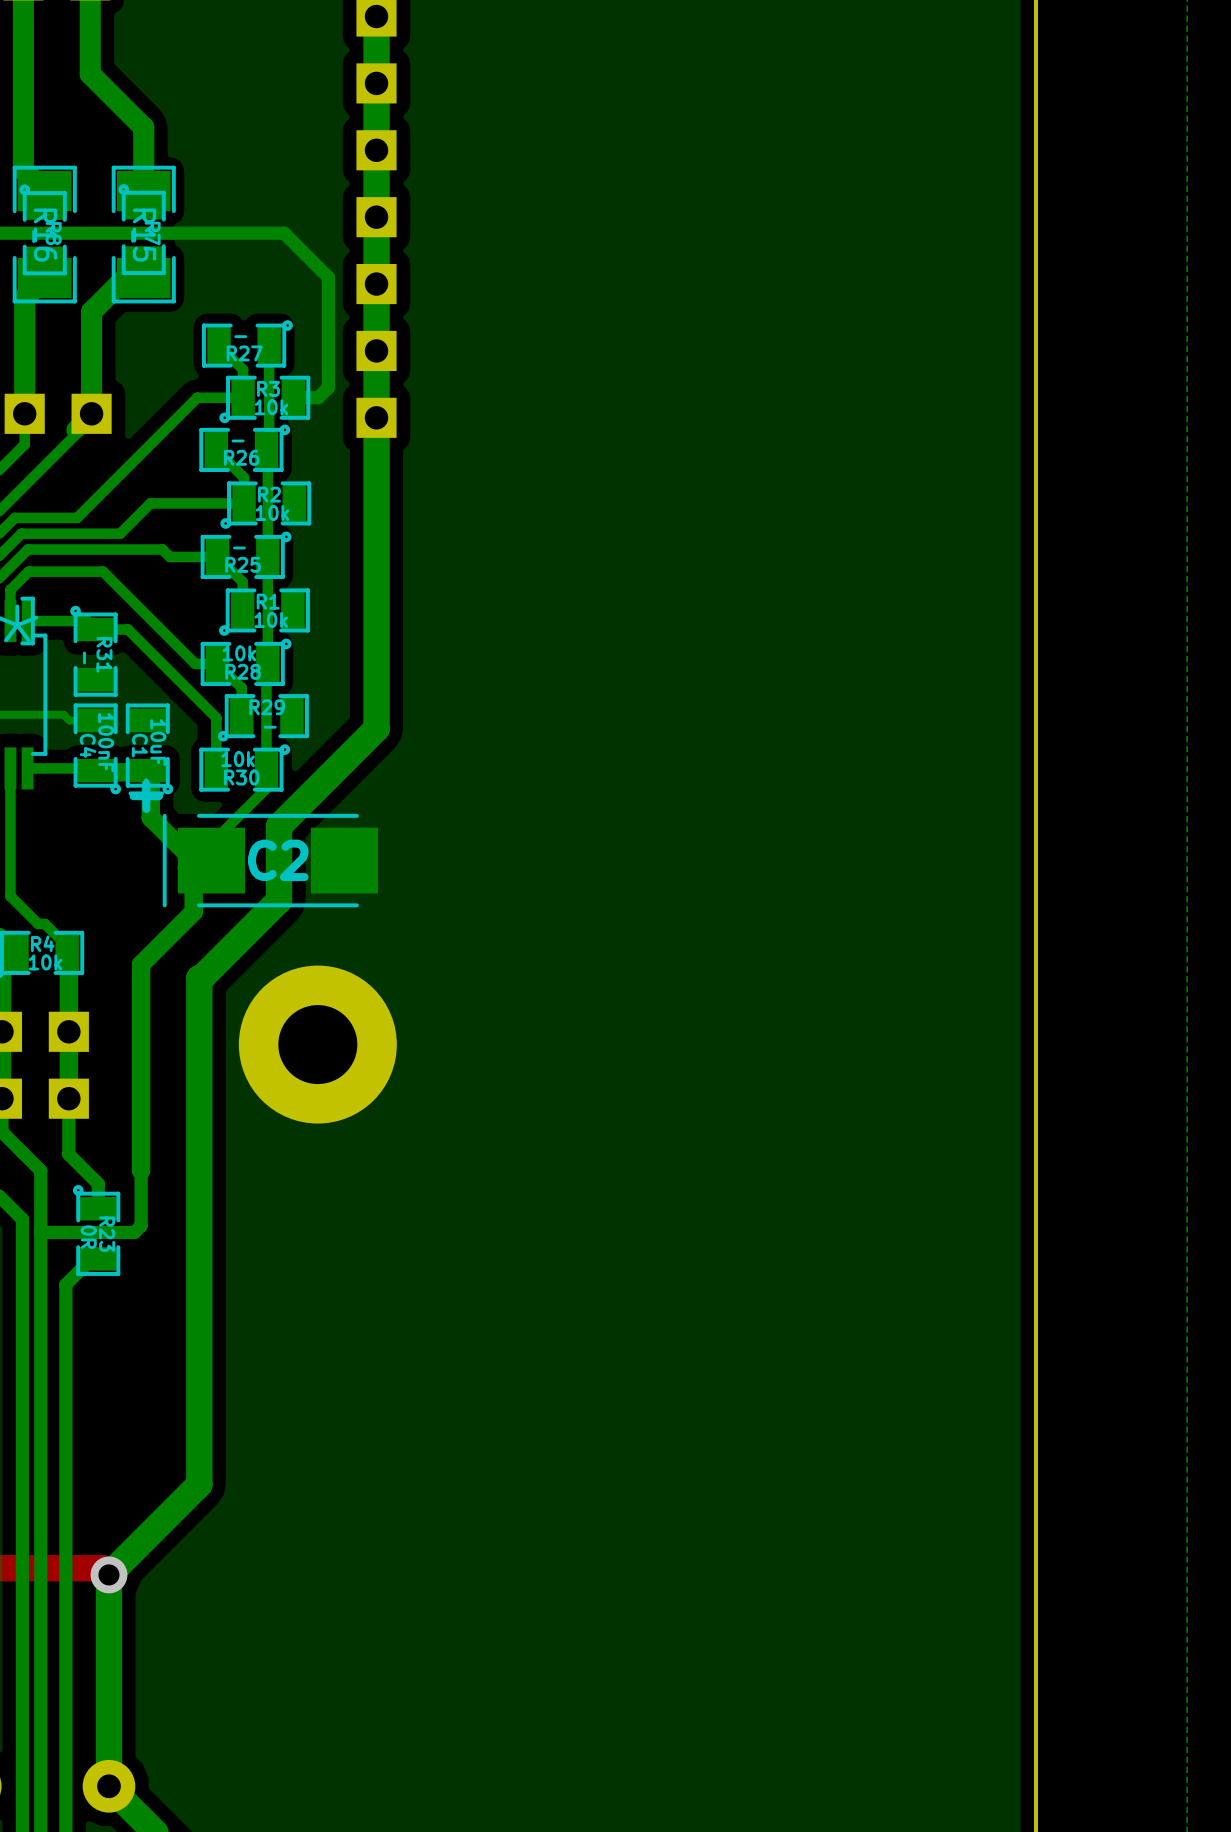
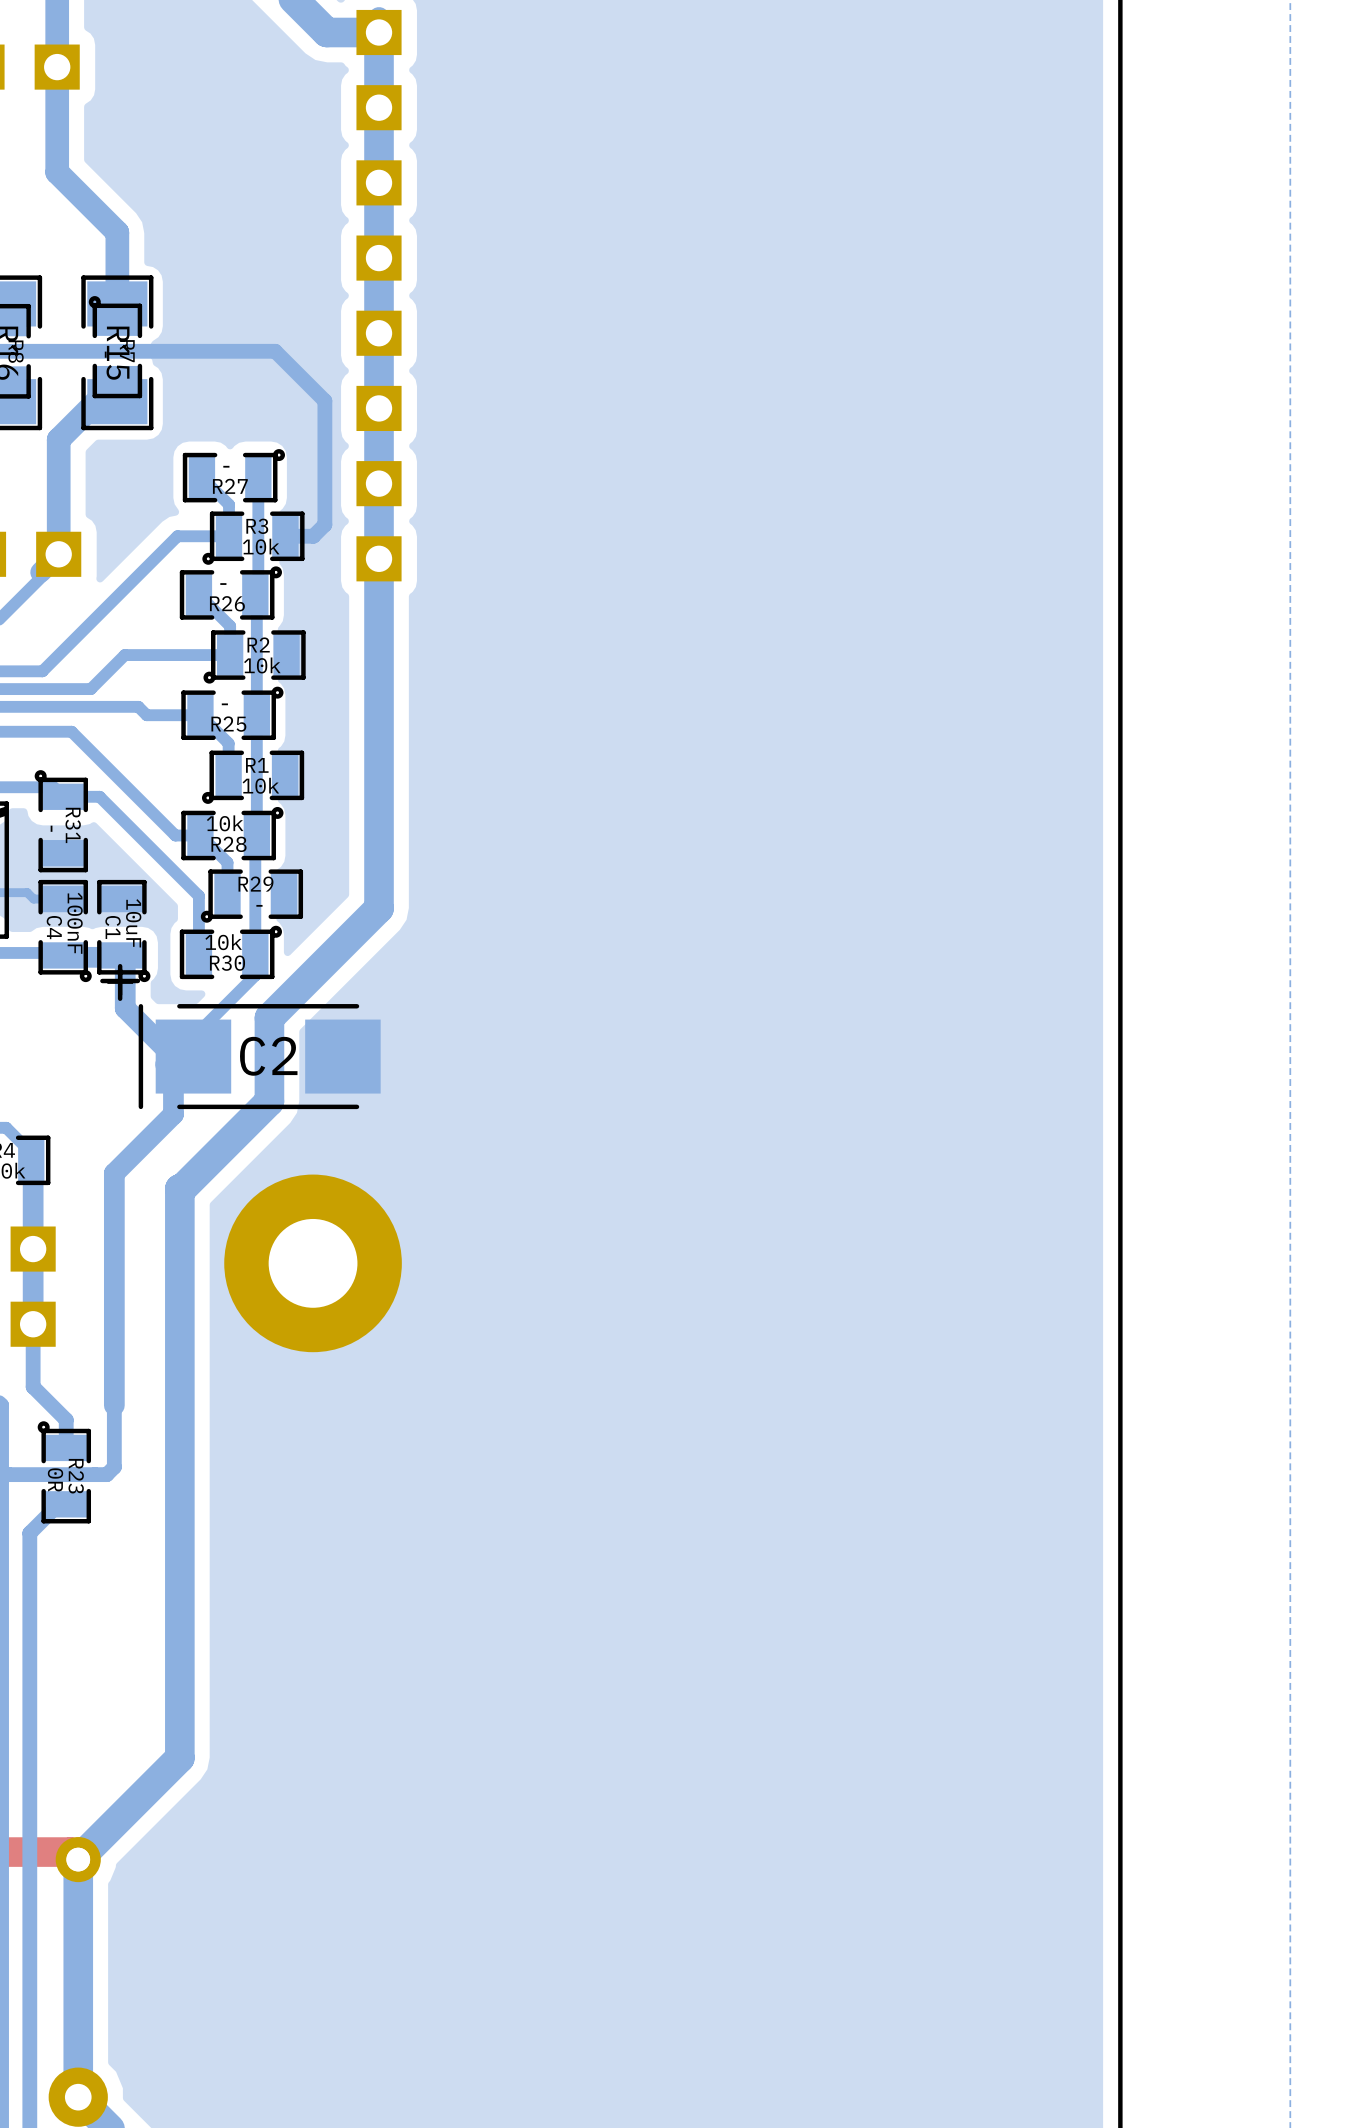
part: none -> (78, 1859)

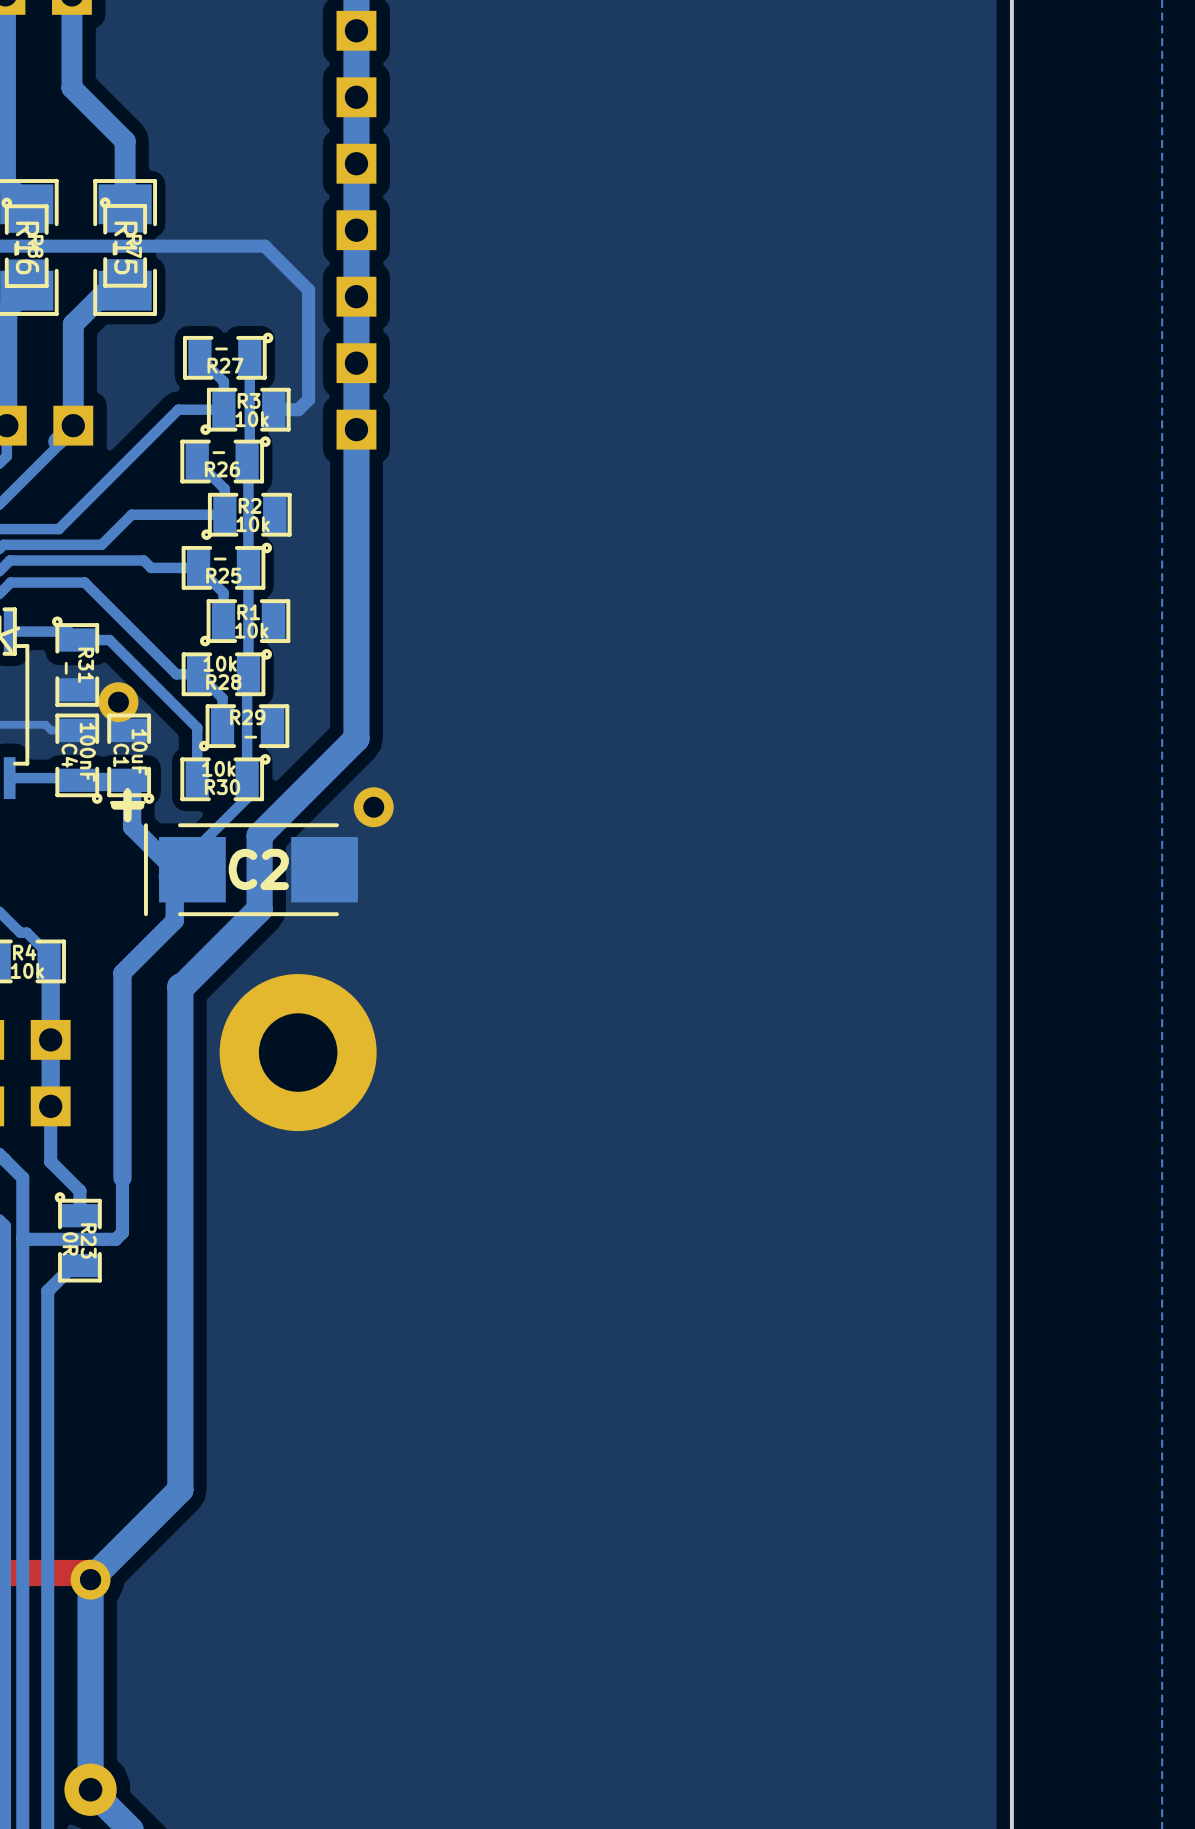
part: none -> (118, 702)
part: none -> (373, 807)

